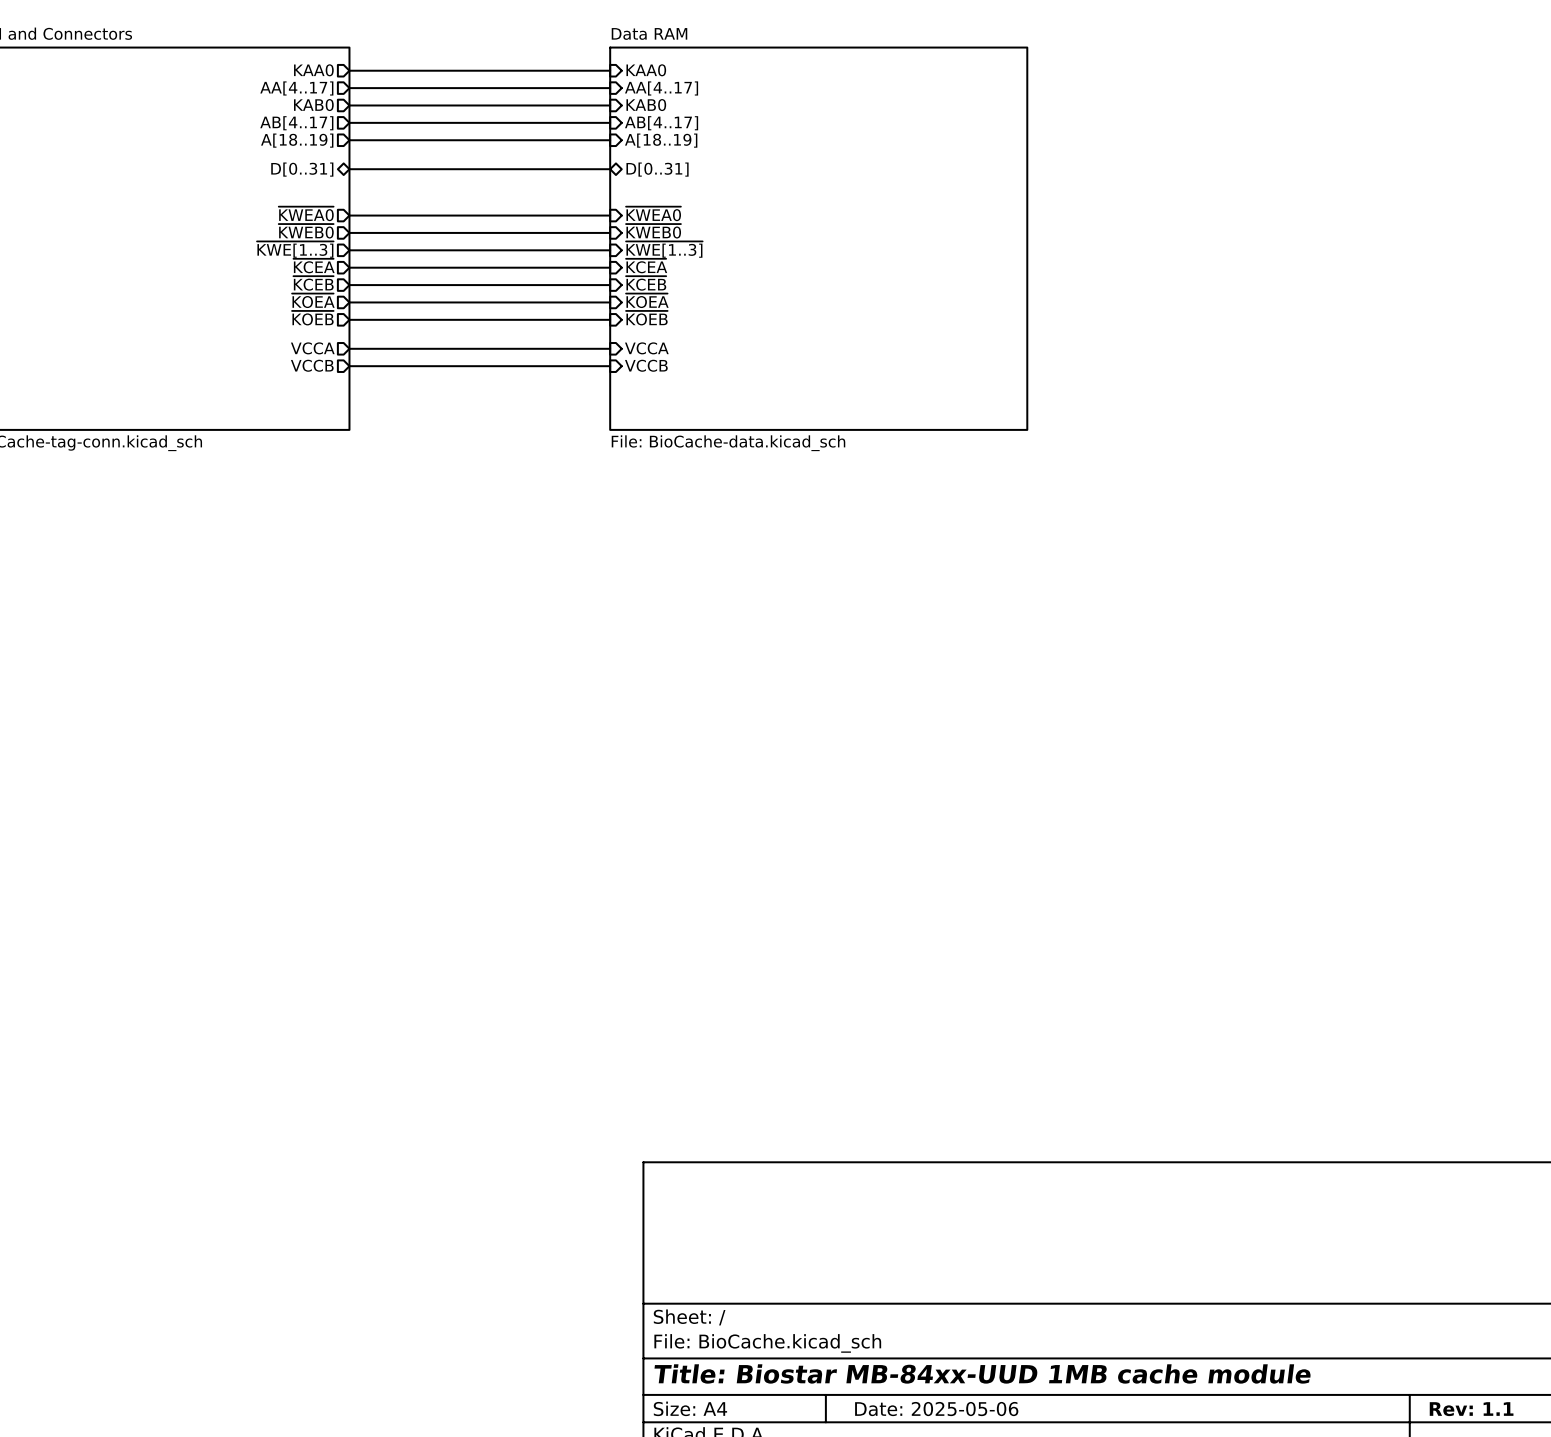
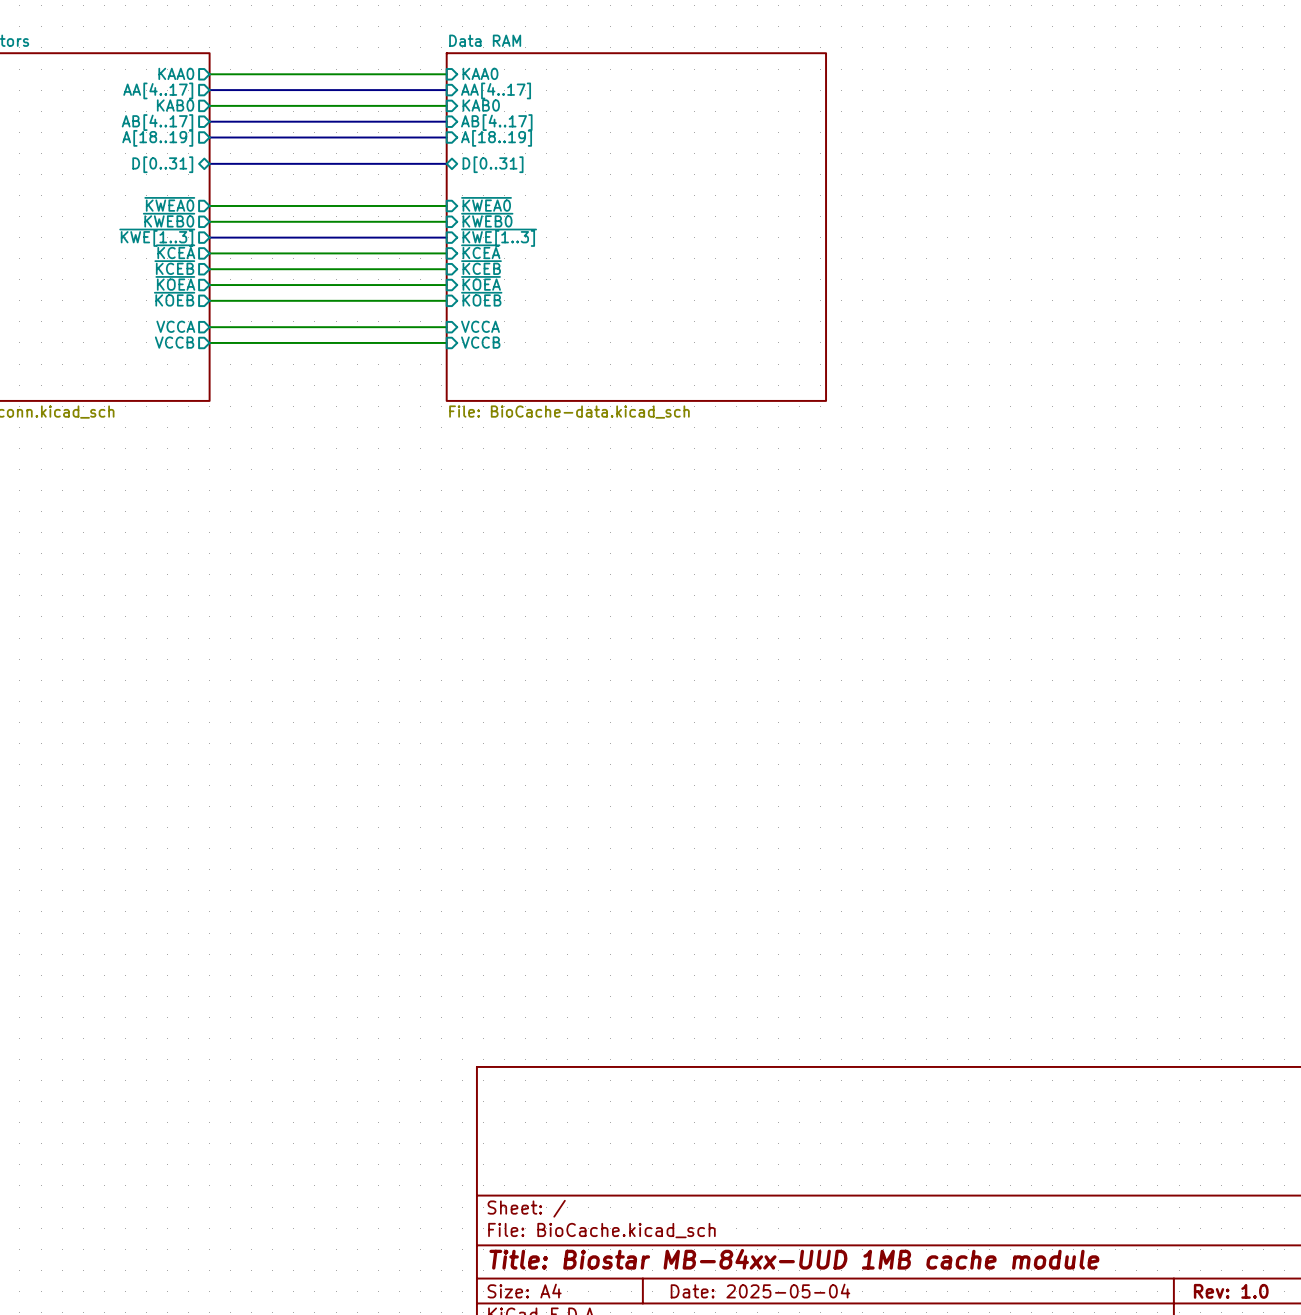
title block: Date: 2025-05-06 (936, 1409) -> Date: 2025-05-04 (760, 1291)
title block: Rev: 1.1 (1471, 1409) -> Rev: 1.0 (1231, 1291)

